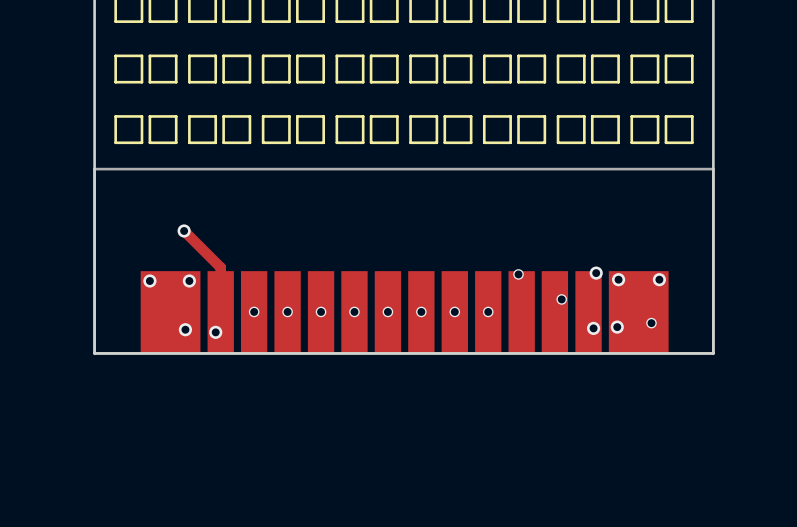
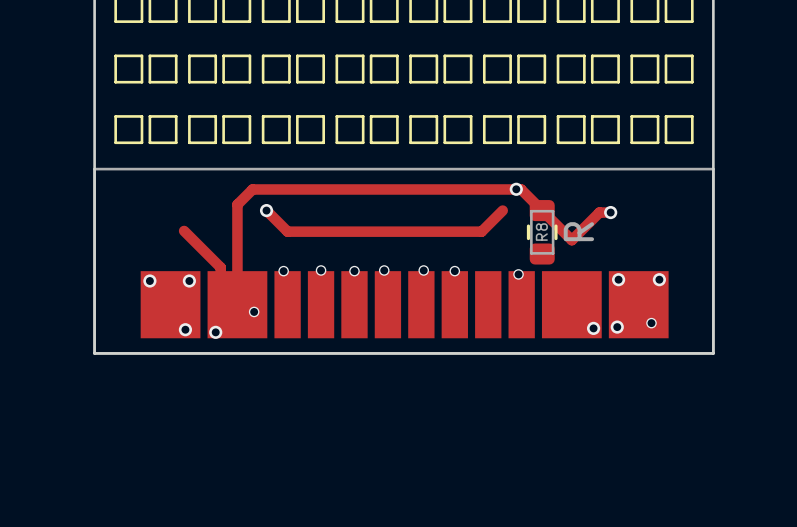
via: none -> (516, 189)
track: none -> (266, 210) (287, 231) (481, 231) (502, 210)
track: none -> (610, 212) (599, 212) (571, 240) (521, 189) (252, 189) (237, 204) (237, 304)
via: none -> (610, 212)
via position: (184, 230) -> (266, 210)
R8: none -> R (542, 232)
via: none -> (321, 270)
via: none -> (384, 270)
via: none -> (423, 270)
drawing shape: [140, 271, 201, 353] -> [140, 271, 201, 339]
drawing: [207, 271, 268, 353] -> none
drawing: none -> [207, 271, 268, 339]
drawing shape: [274, 271, 301, 353] -> [274, 271, 301, 339]
via: none -> (283, 271)
drawing shape: [307, 271, 335, 353] -> [307, 271, 335, 339]
drawing shape: [341, 271, 368, 353] -> [341, 271, 368, 339]
via: none -> (354, 271)
drawing shape: [374, 271, 402, 353] -> [374, 271, 402, 339]
drawing shape: [408, 271, 435, 353] -> [408, 271, 435, 339]
drawing shape: [441, 271, 468, 353] -> [441, 271, 468, 339]
via: none -> (454, 271)
drawing shape: [475, 271, 502, 353] -> [475, 271, 502, 339]
drawing shape: [508, 271, 535, 353] -> [508, 271, 535, 339]
drawing: [541, 271, 602, 353] -> none
drawing: none -> [541, 271, 602, 339]
drawing shape: [608, 271, 669, 353] -> [608, 271, 669, 339]
via: (596, 273) -> none
via: (561, 299) -> none
via: (287, 311) -> none
via: (321, 311) -> none
via: (354, 311) -> none
via: (387, 311) -> none
via: (421, 311) -> none
via: (454, 311) -> none
via: (488, 311) -> none

